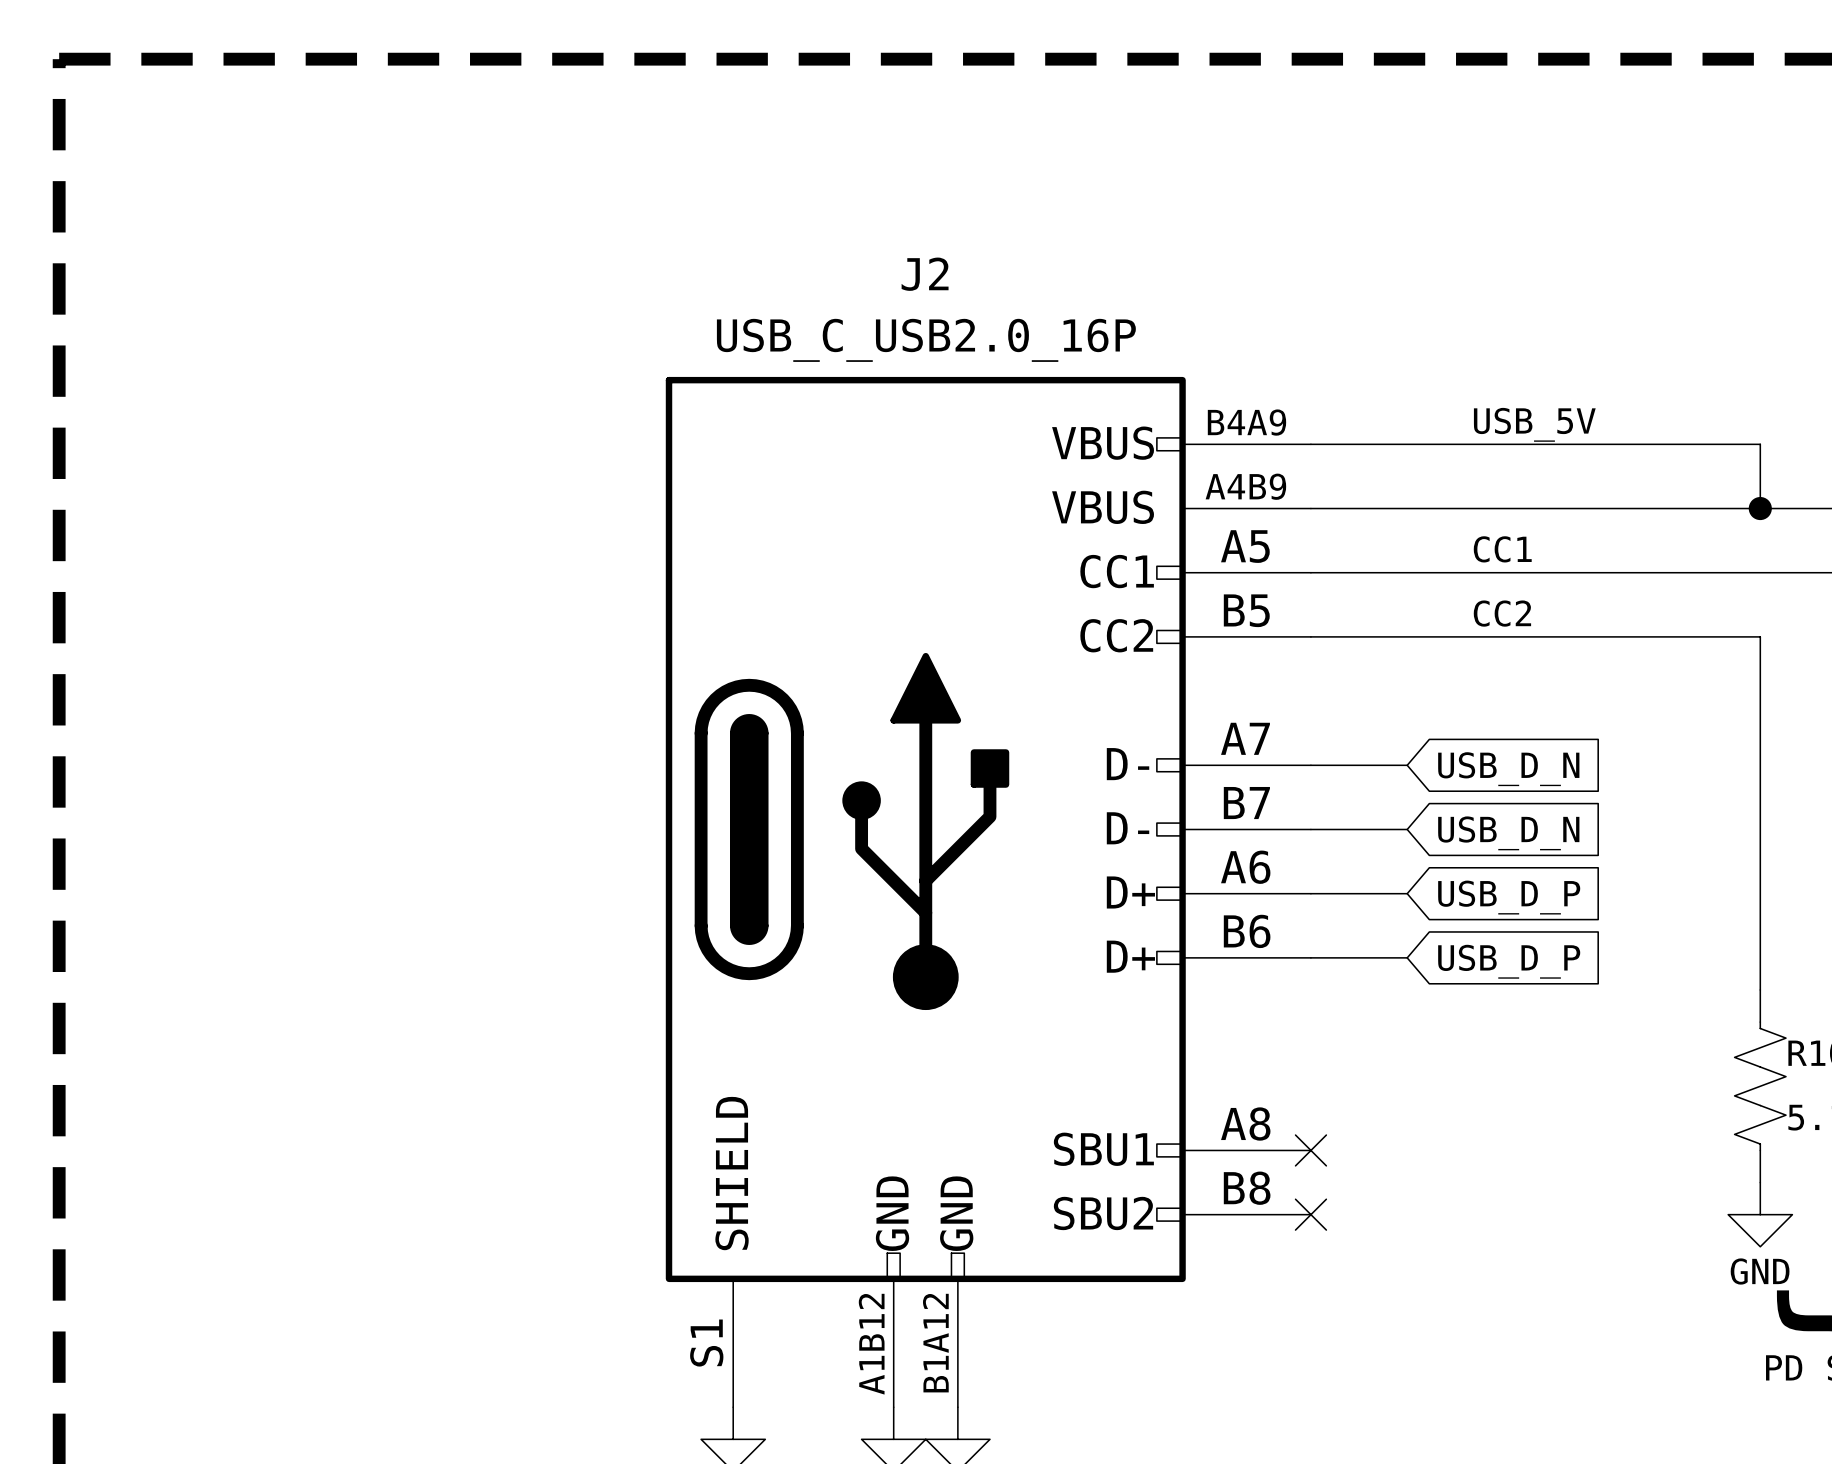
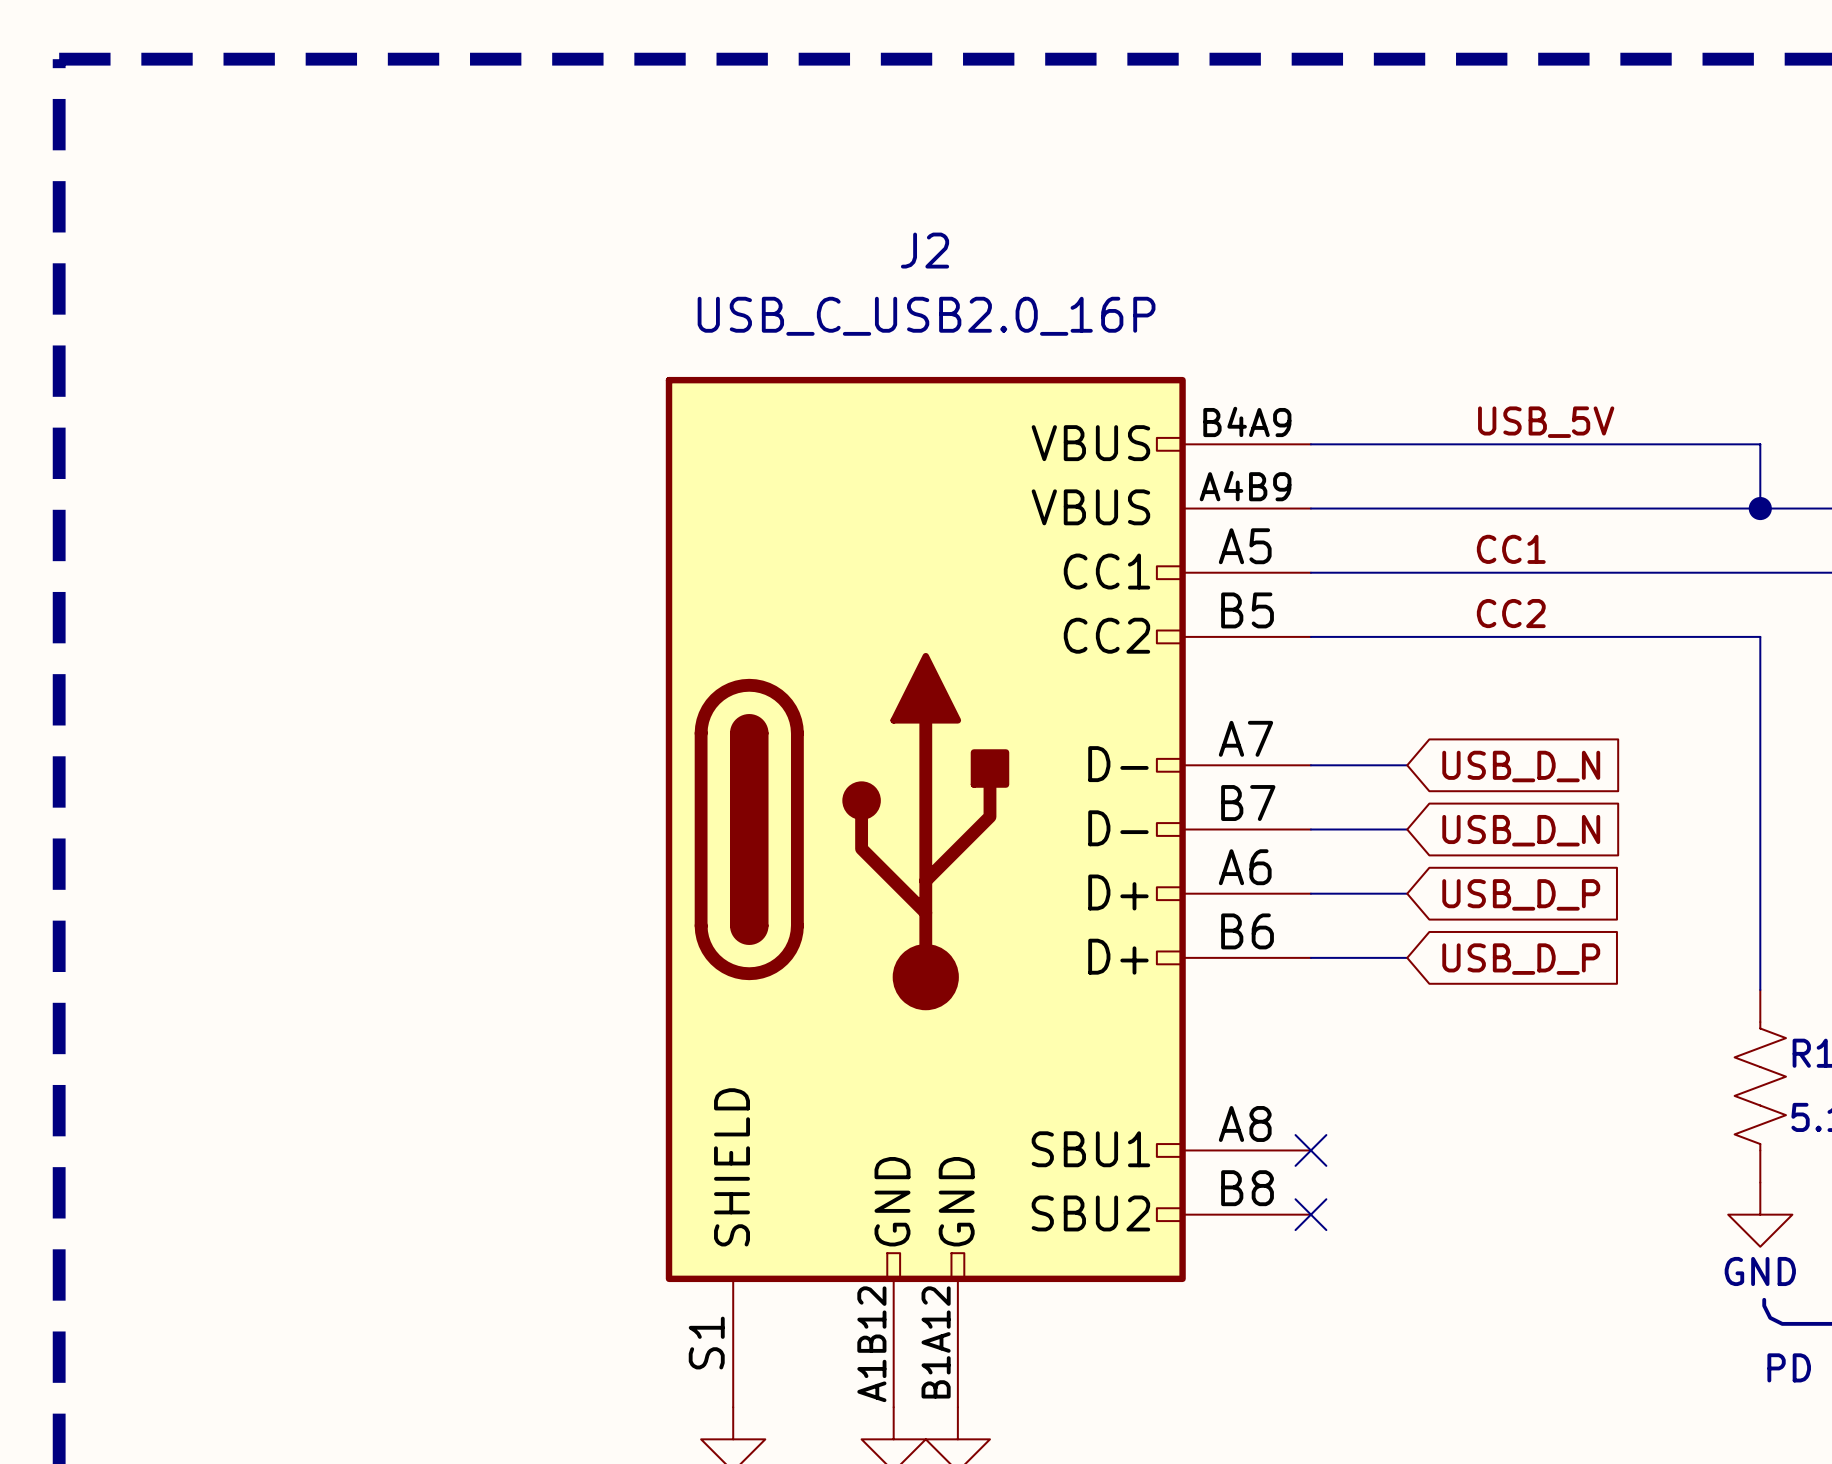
J2 name position: J2 (925, 274) -> J2 (925, 250)
J2 value position: USB_C_USB2.0_16P (926, 340) -> USB_C_USB2.0_16P (926, 316)

